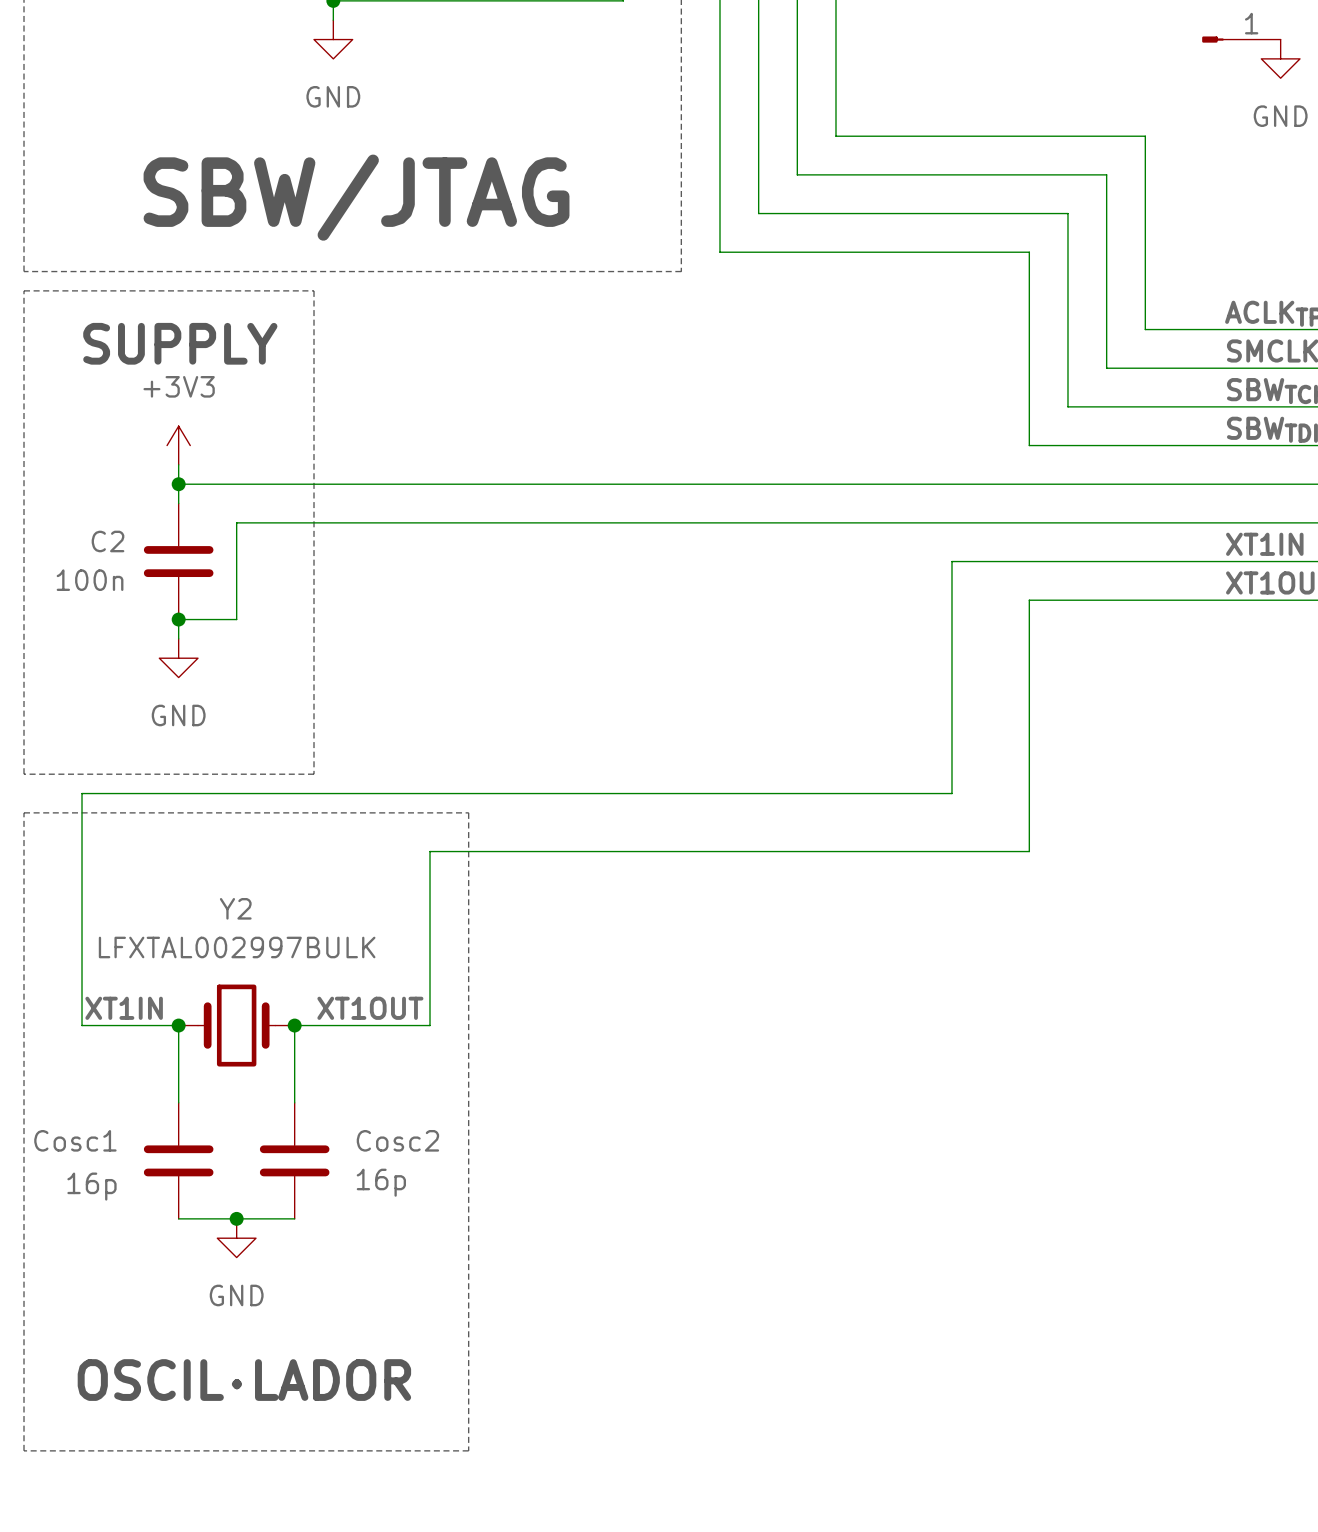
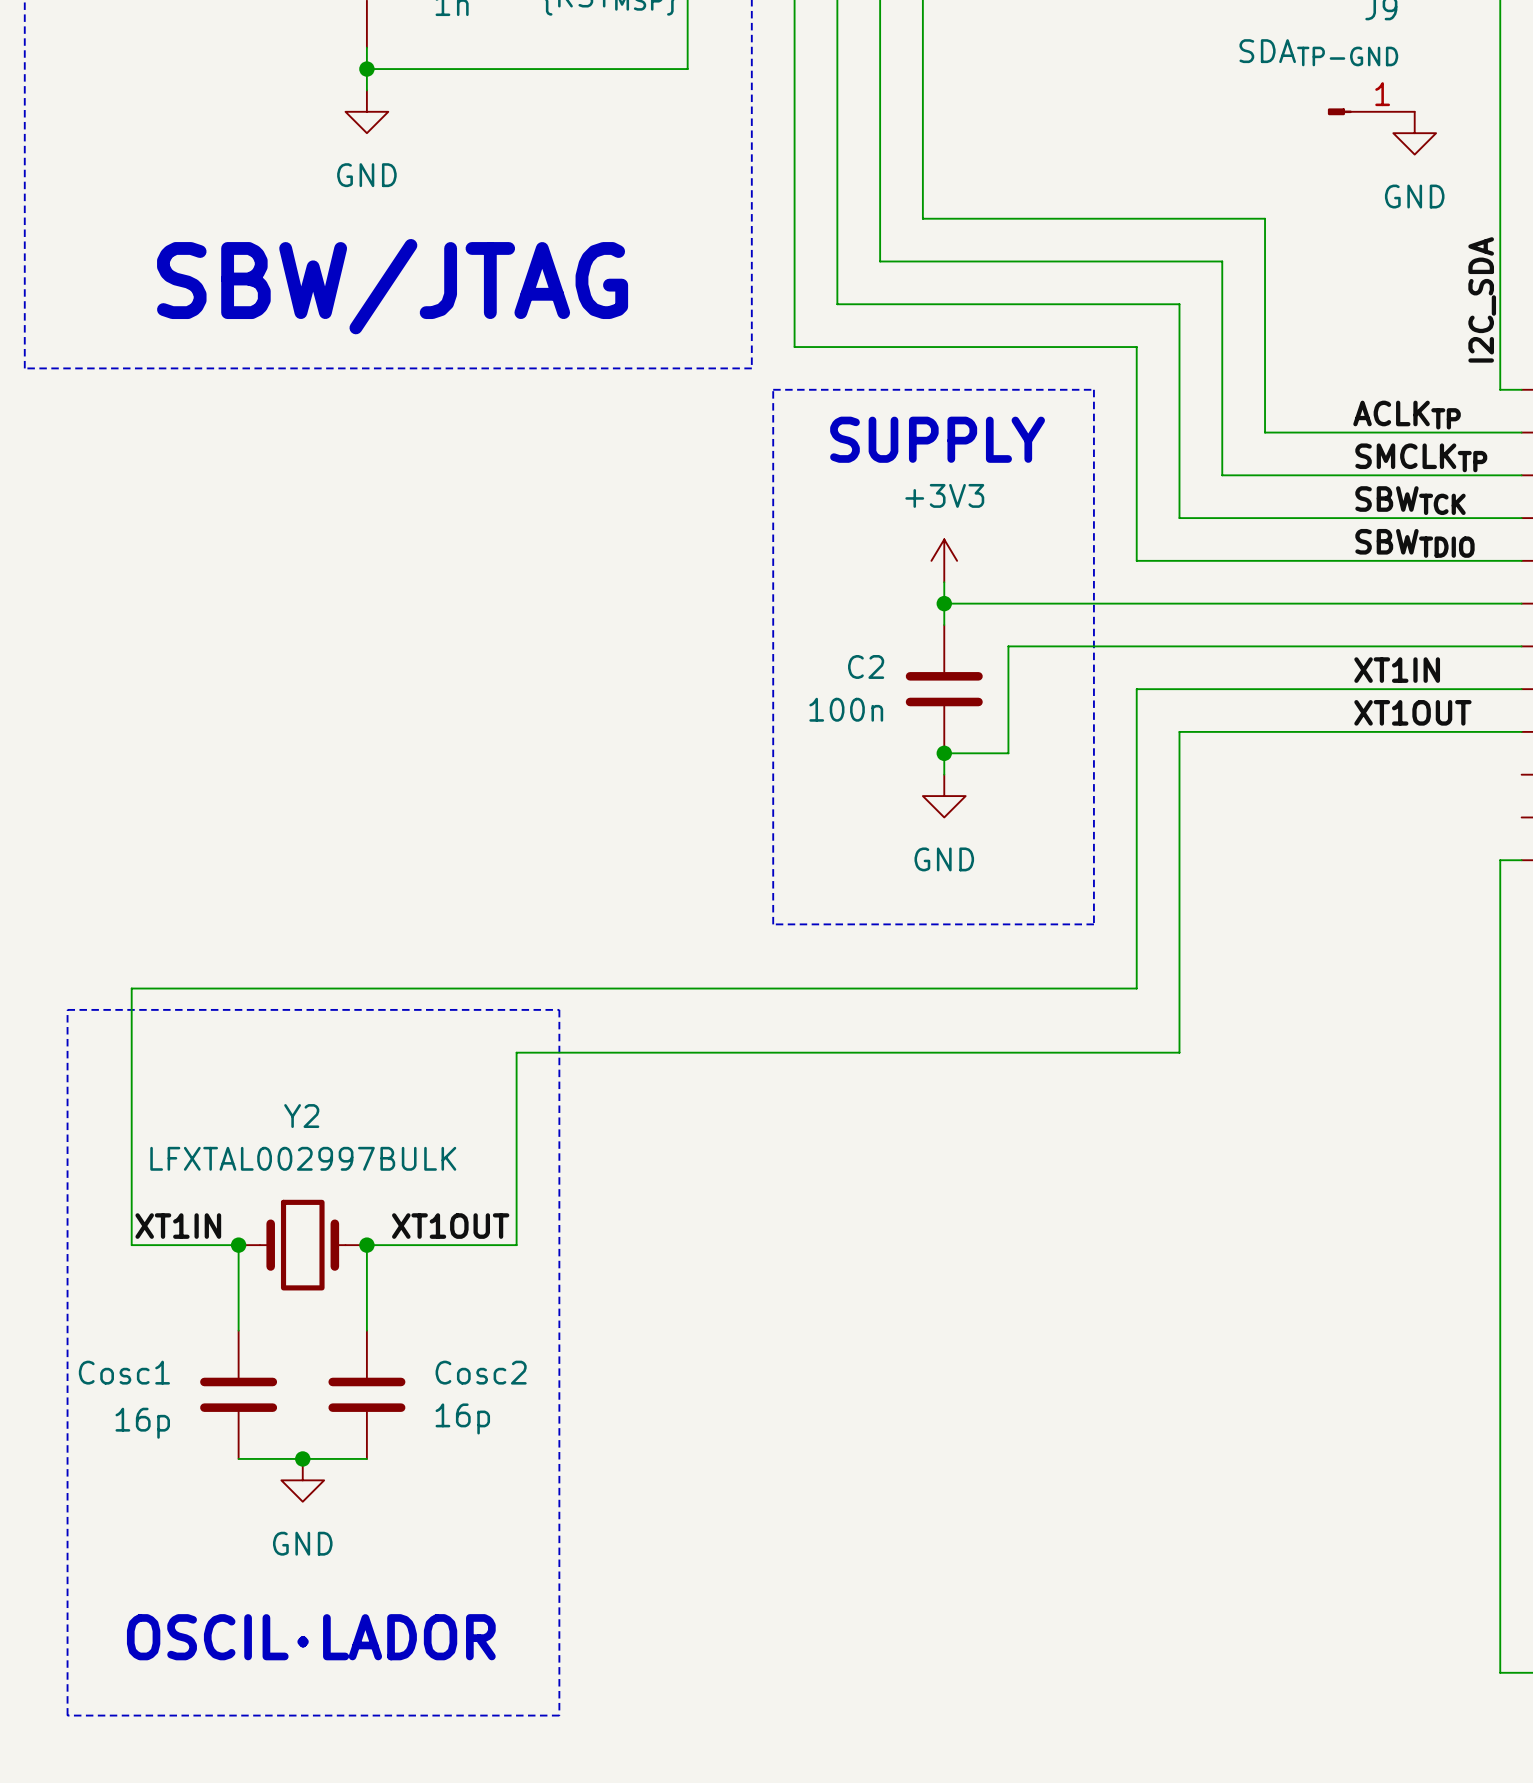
line: (24, 290) (314, 290) (314, 774) (24, 774) (24, 290) -> none
line: none -> (773, 389) (1093, 389) (1093, 924) (773, 924) (773, 389)
text: none -> SUPPLY (937, 439)
text: SUPPLY (180, 343) -> none
power symbol: +3V3 (178, 445) -> none
power symbol: none -> +3V3 (944, 560)
wire: (178, 464) (178, 503) -> none
wire: none -> (944, 582) (944, 625)
wire: (178, 484) (855, 484) -> none
junction: (178, 484) -> none
junction: none -> (944, 603)
wire: (913, 522) (236, 522) (236, 619) (178, 619) (178, 638) -> (1008, 646) (1008, 753) (944, 753) (944, 774)
C2 position: (178, 561) -> (944, 689)
wire: (1029, 561) (951, 561) (951, 793) (82, 793) (82, 1025) (178, 1025) (178, 1102) -> none
wire: (1029, 600) (1067, 600) -> (1136, 731) (1136, 689)
wire: none -> (1179, 731) (1179, 1052) (516, 1052) (516, 1245) (366, 1245) (366, 1330)
junction: (178, 619) -> none
junction: none -> (944, 753)
power symbol: GND (178, 658) -> none
power symbol: none -> GND (944, 796)
line: (24, 812) (24, 1450) (468, 1450) (468, 812) (24, 812) -> (67, 1009) (67, 1715) (559, 1715) (559, 1009) (67, 1009)
wire: (1029, 832) (1029, 851) (430, 851) (430, 1025) (294, 1025) (294, 1102) -> (1136, 988) (131, 988) (131, 1245) (238, 1245) (238, 1330)
label position: XT1IN (124, 1008) -> XT1IN (178, 1226)
label position: XT1OUT (370, 1008) -> XT1OUT (450, 1226)
junction: (178, 1025) -> none
Y2 position: (236, 1025) -> (302, 1245)
junction: (294, 1025) -> none
junction: none -> (238, 1245)
junction: none -> (366, 1245)
Cosc1 position: (178, 1160) -> (238, 1394)
Cosc2 position: (294, 1160) -> (366, 1394)
wire: (178, 1218) (294, 1218) -> (238, 1458) (366, 1458)
junction position: (236, 1218) -> (302, 1458)
power symbol position: GND (236, 1238) -> GND (302, 1480)
text position: OSCIL·LADOR (244, 1380) -> OSCIL·LADOR (311, 1637)

